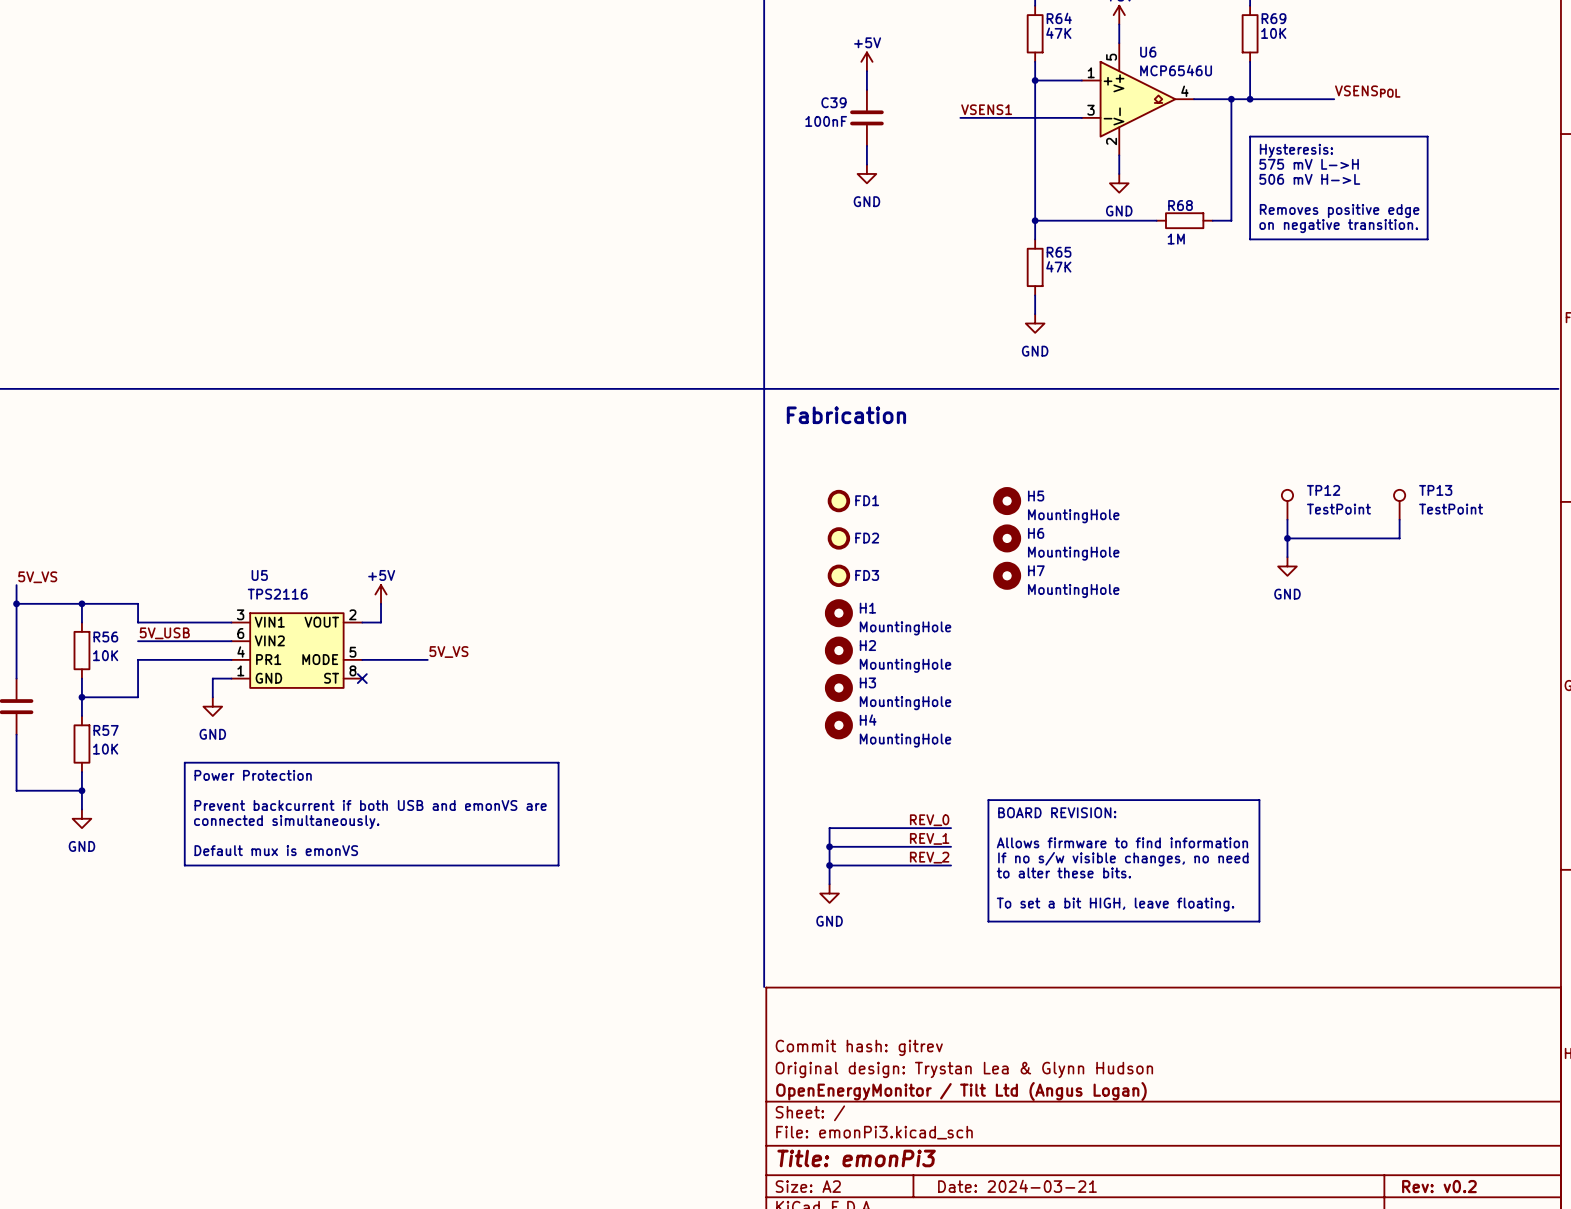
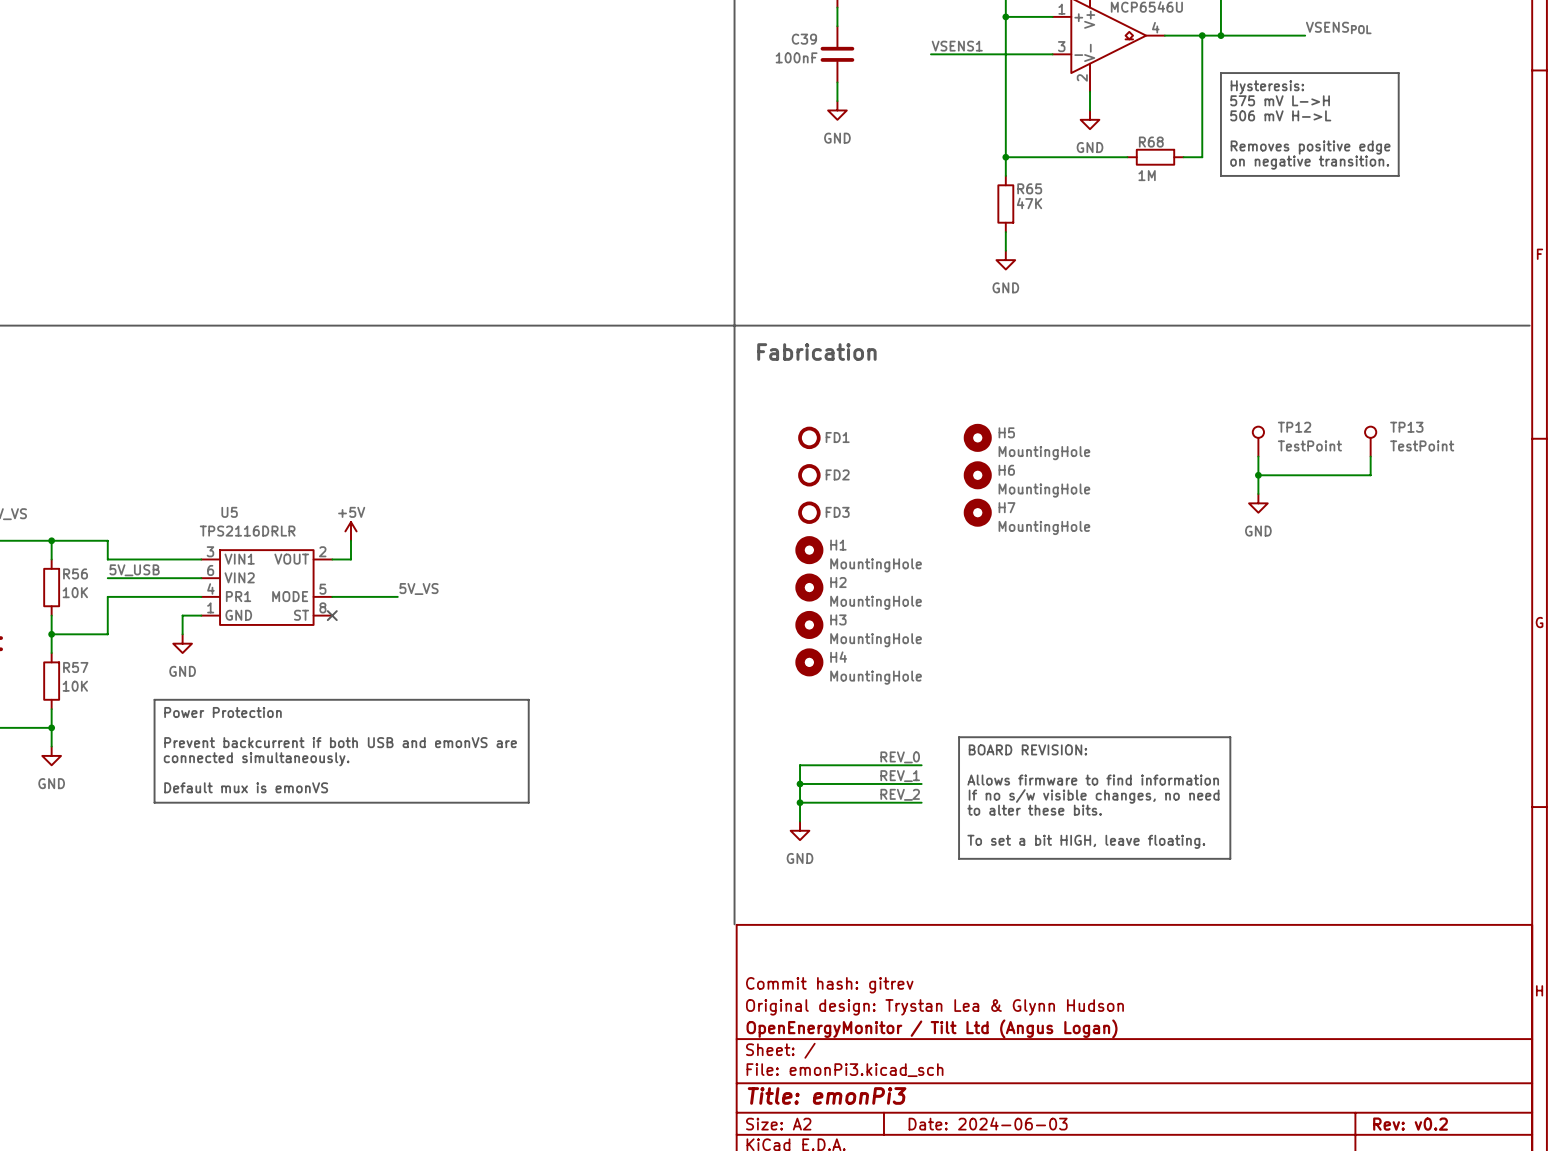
U5 value: TPS2116 (277, 594) -> TPS2116DRLR (247, 531)
title block: Date: 2024-03-21 (1017, 1186) -> Date: 2024-06-03 (988, 1123)

